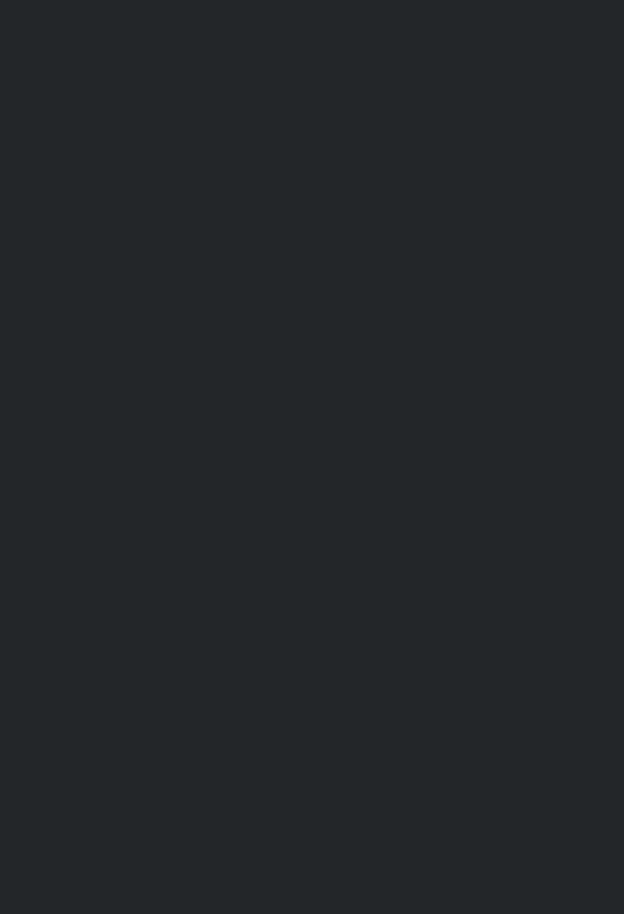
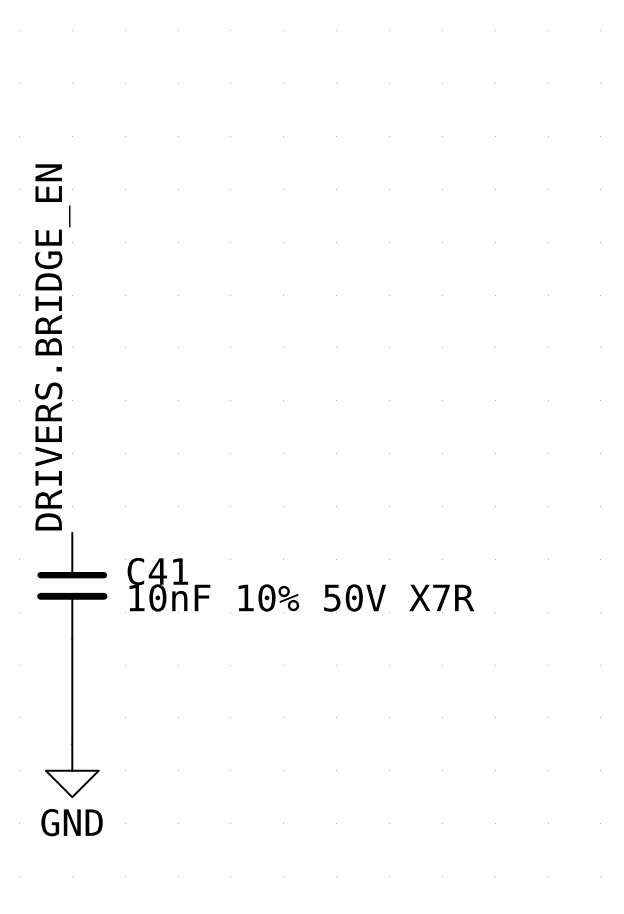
label: none -> DRIVERS.BRIDGE_EN (52, 347)
C41: none -> 10nF 10% 50V X7R (72, 585)
wire: none -> (72, 638) (72, 744)
power symbol: none -> GND (72, 770)

